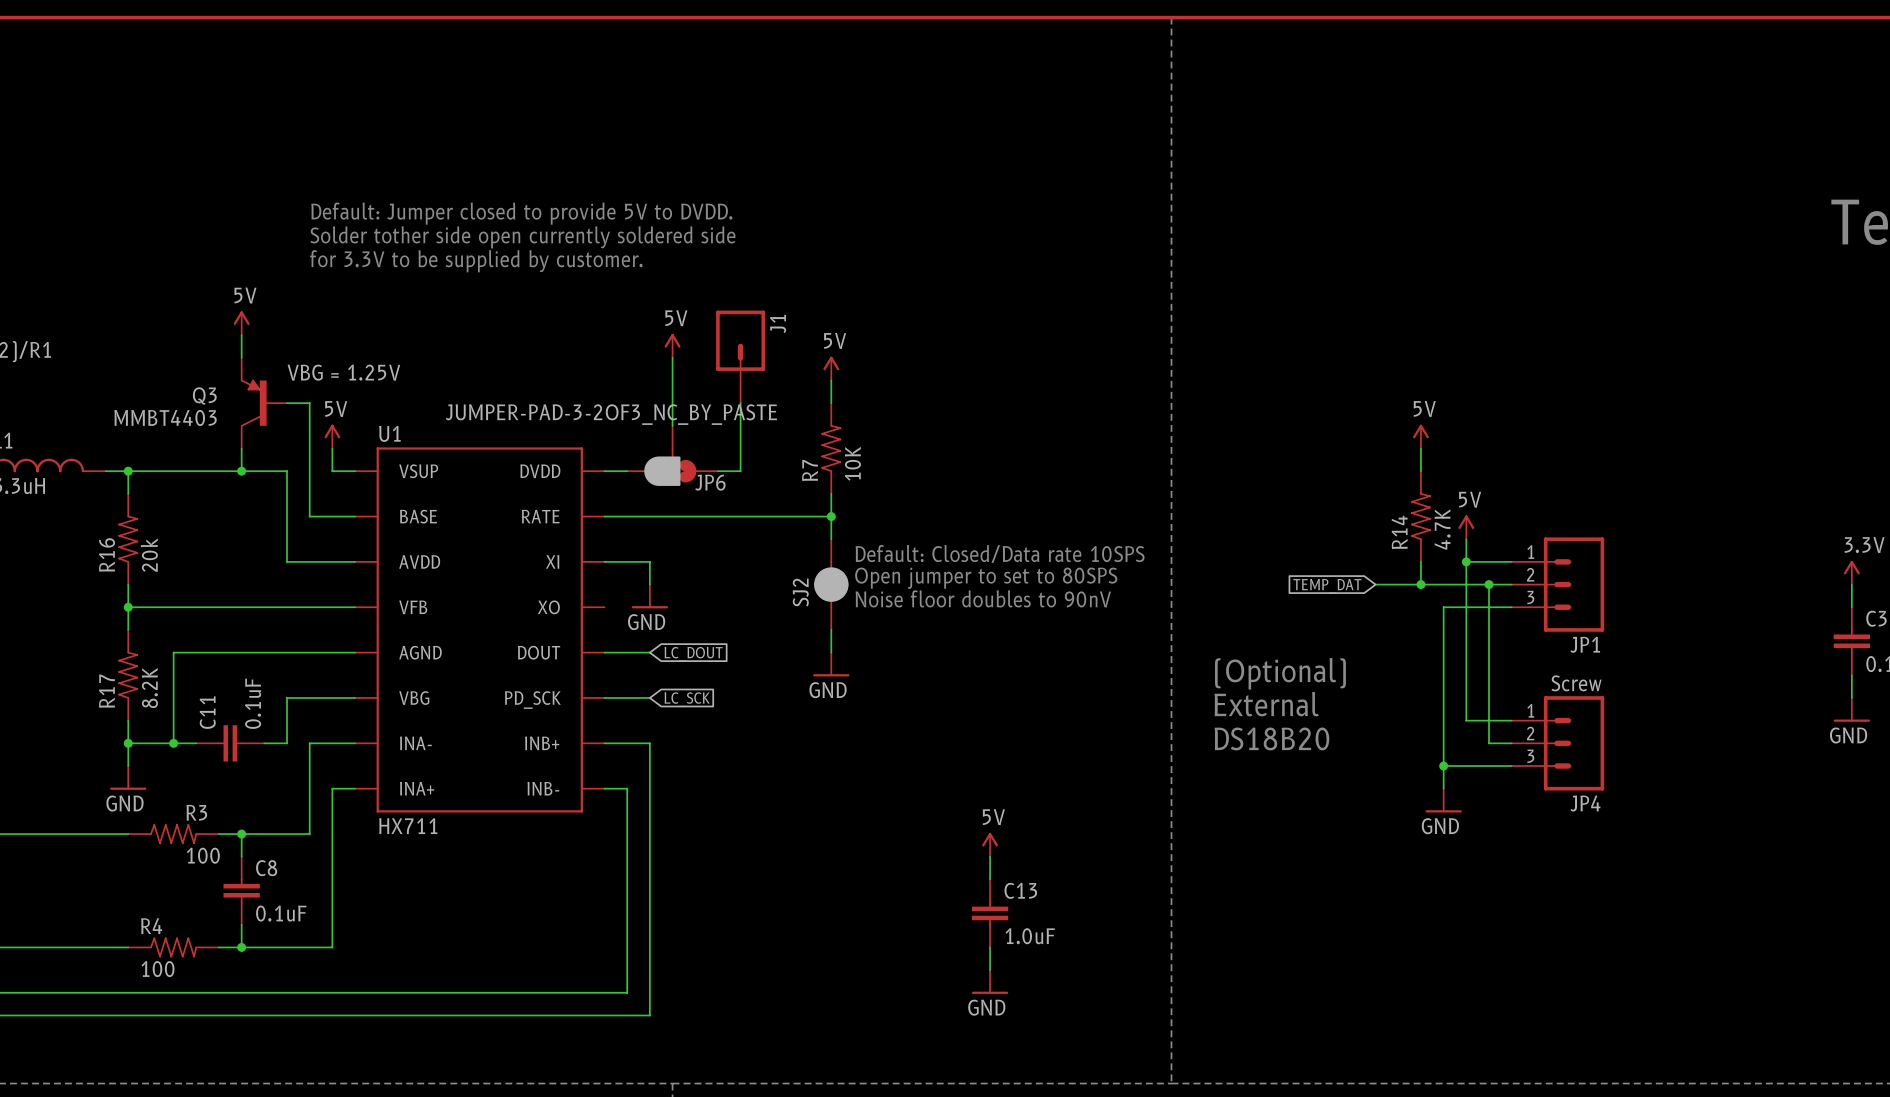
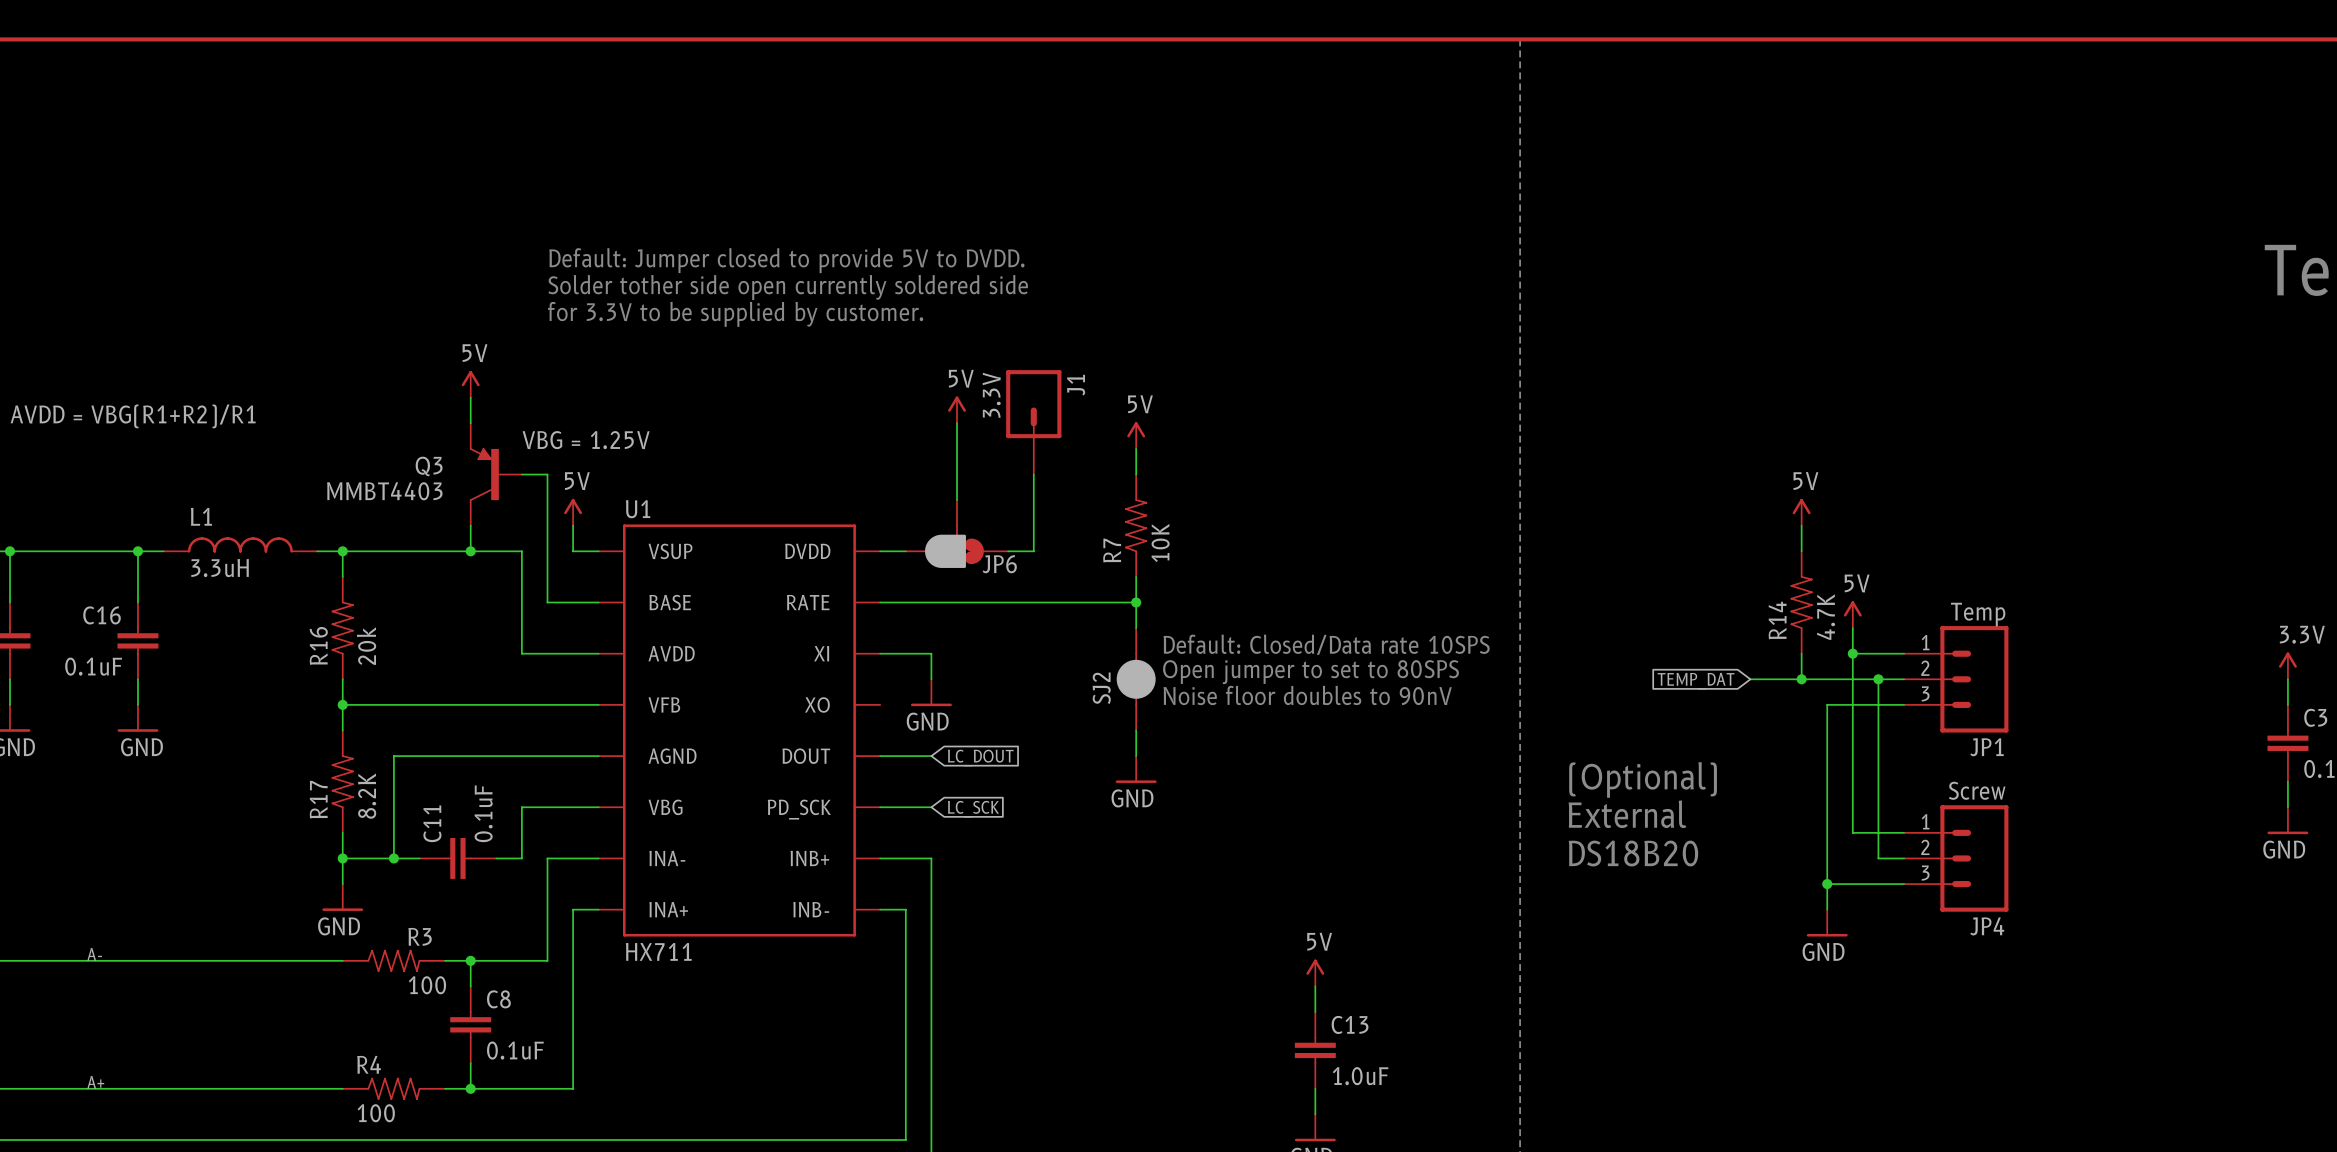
J1 value: none -> 3.3V (991, 395)
JP6 value: JUMPER-PAD-3-2OF3_NC_BY_PASTE (611, 414) -> none
JP1 value: none -> Temp (1978, 614)

